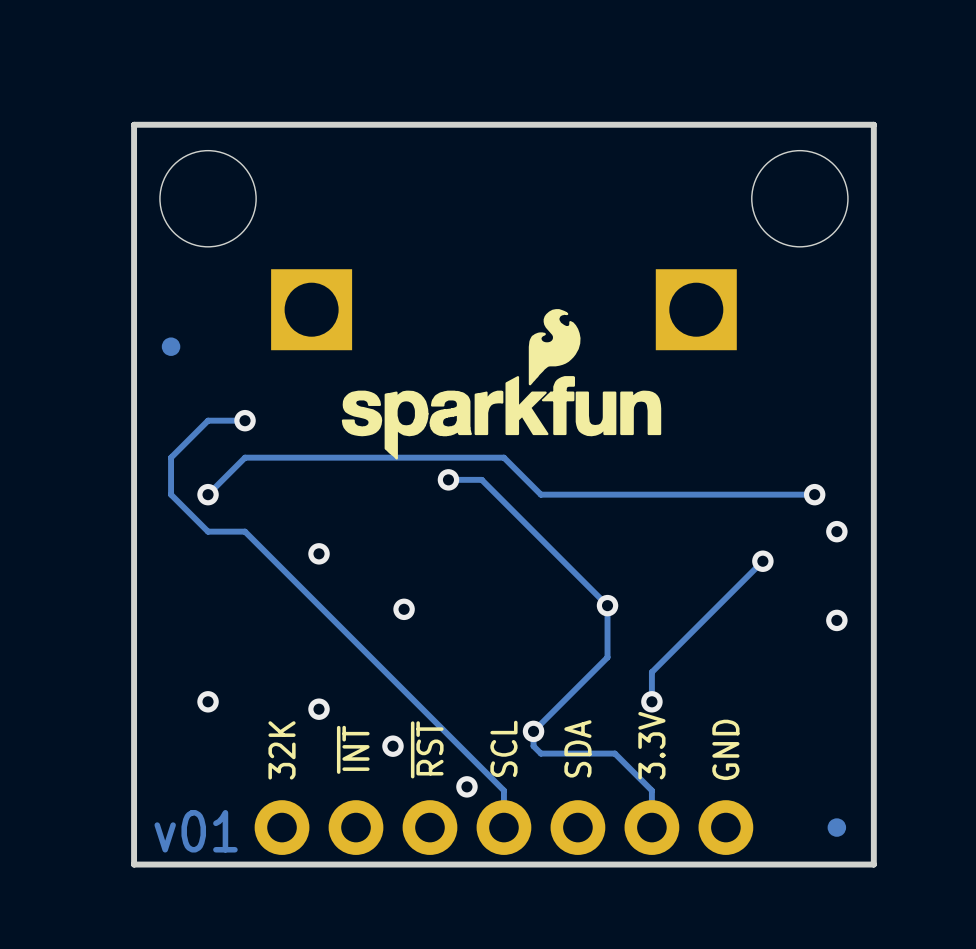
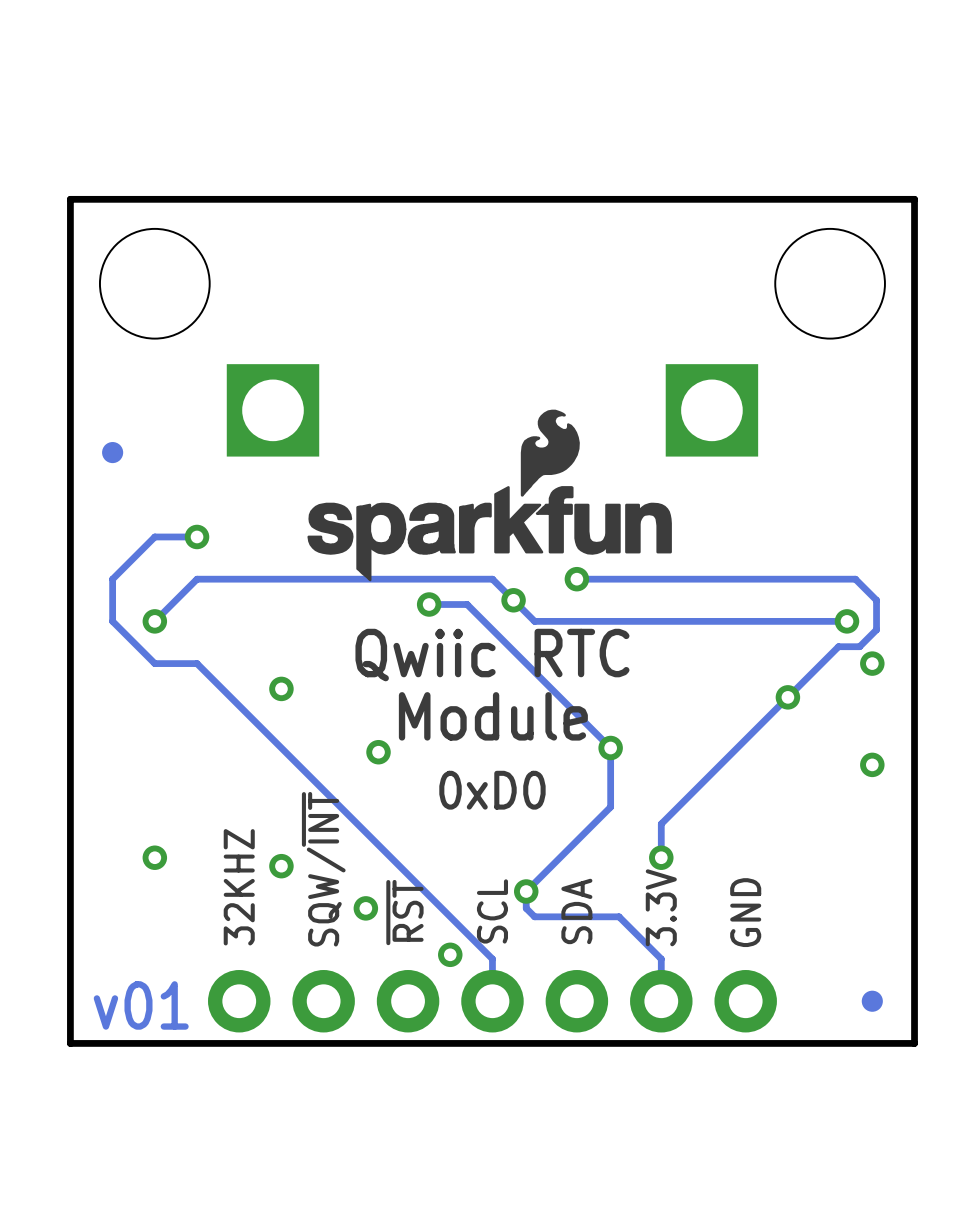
track: none -> (576, 579) (855, 579) (876, 600) (876, 629) (859, 646) (838, 646) (787, 697)
via: none -> (576, 579)
via: none -> (513, 600)
text: none -> Qwiic RTC (492, 655)
text: none -> Module (493, 716)
text: none -> 0xD0 (492, 790)
text: ~{INT} (353, 749) -> SQW/~{INT} (323, 869)
text: 32K (282, 750) -> 32KHZ (239, 887)

